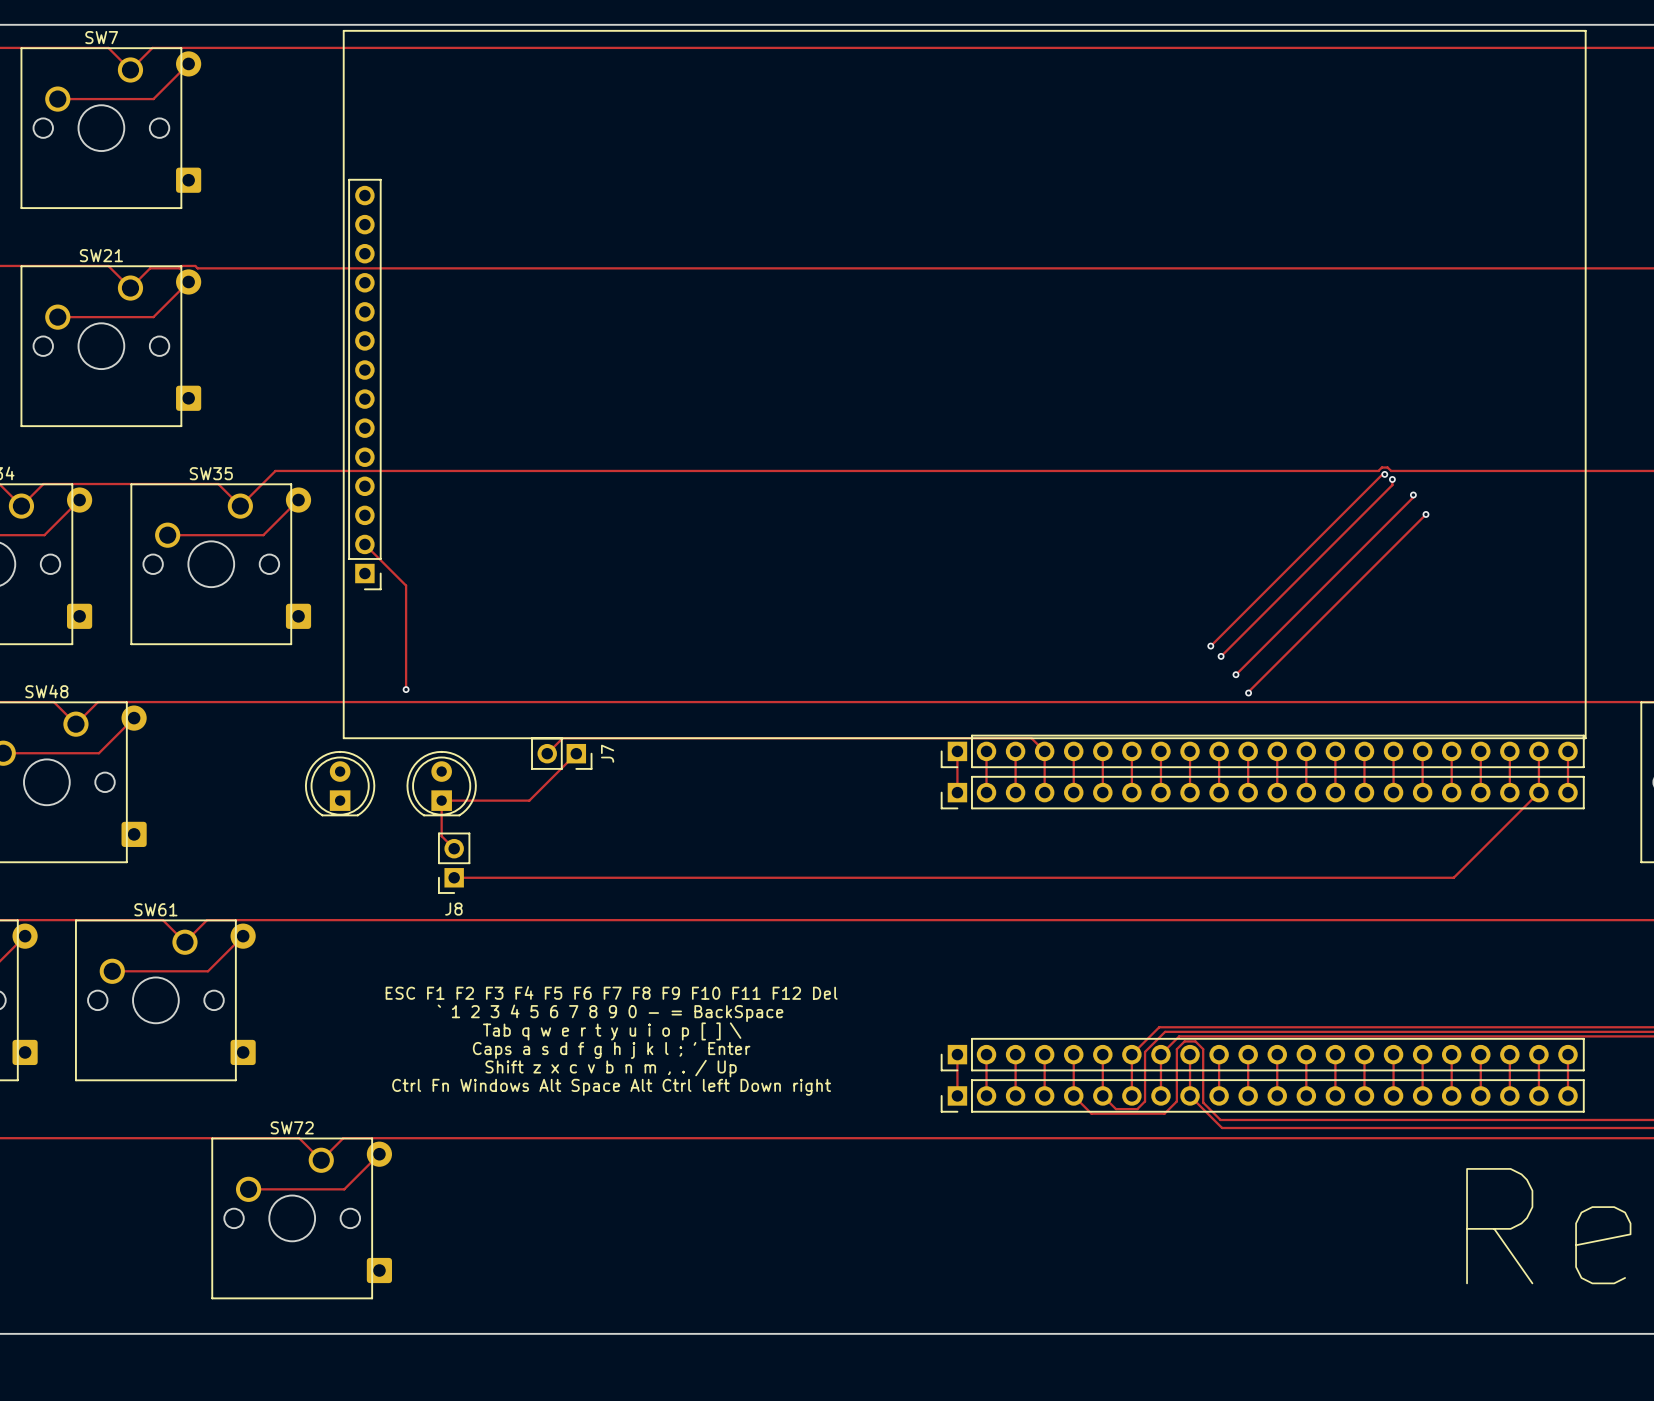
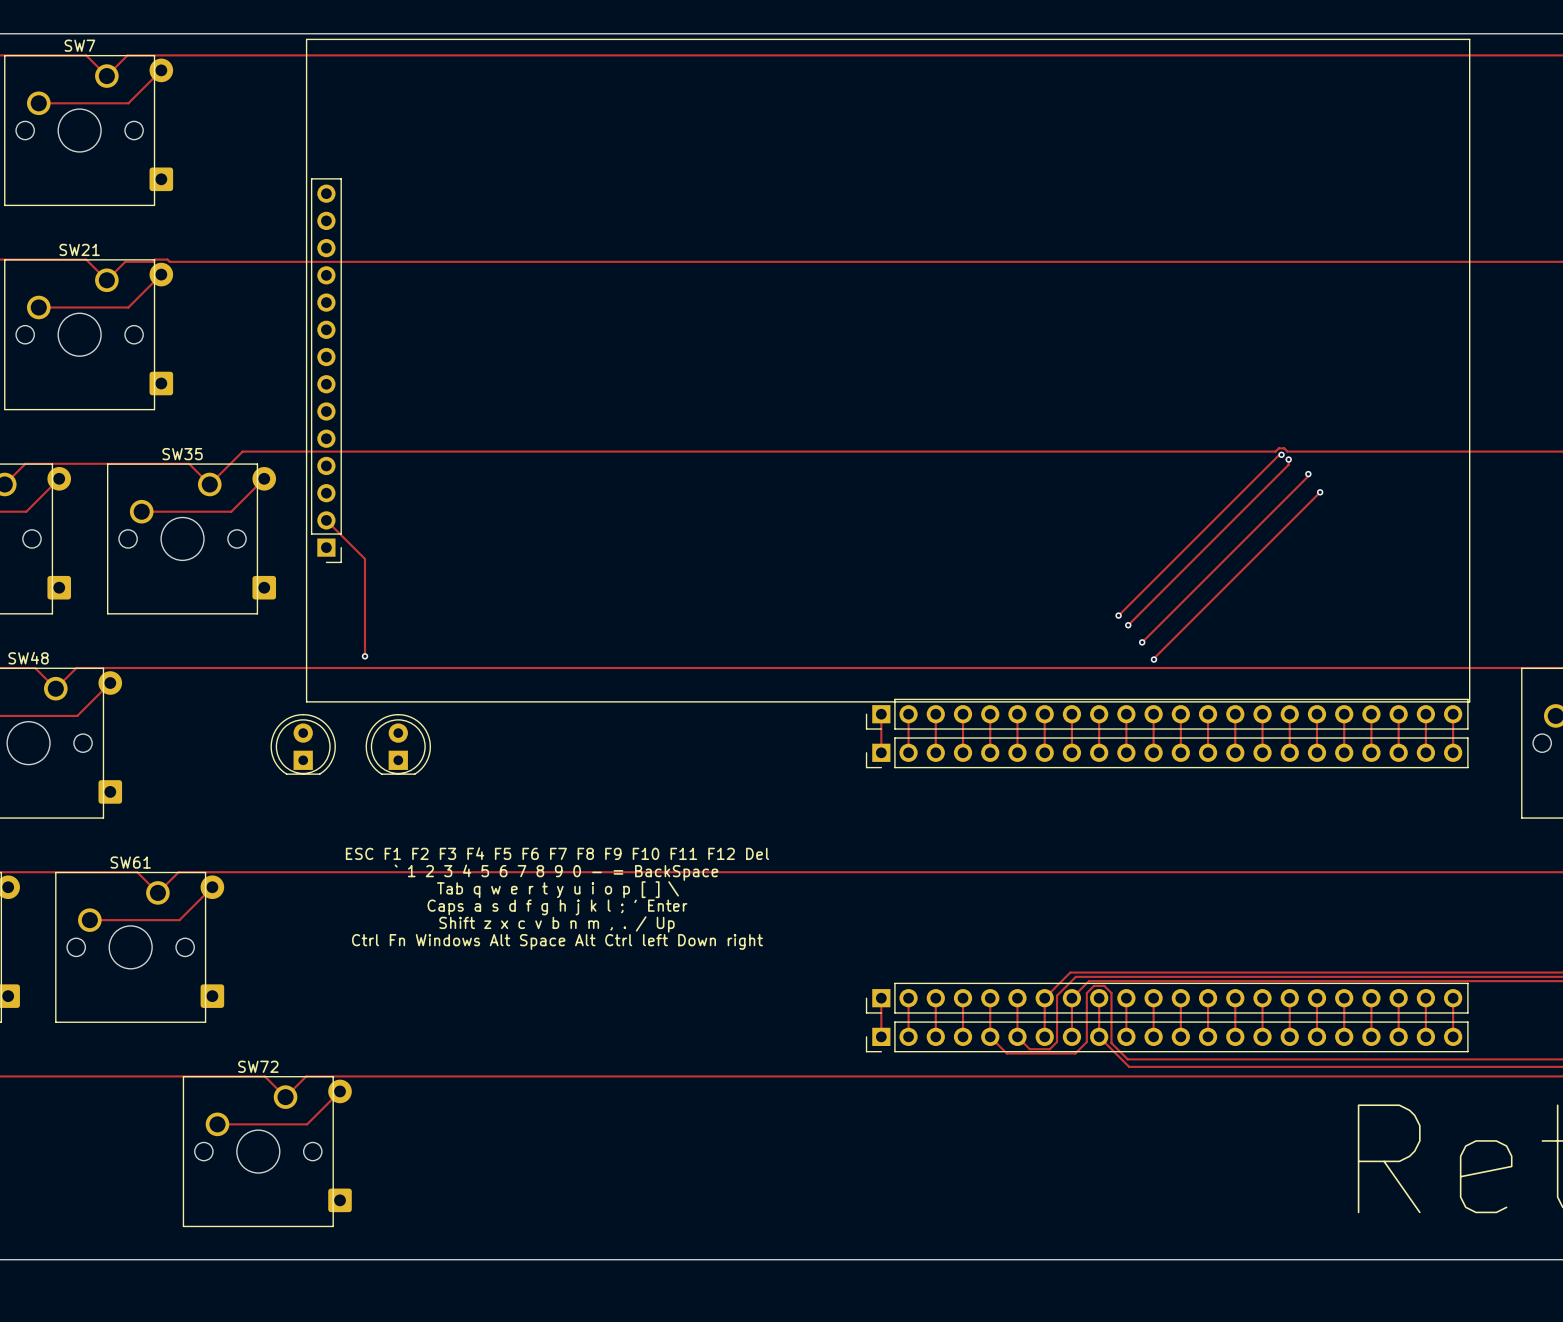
track: (1044, 751) (1031, 738) (562, 738) (547, 753) -> none
J7: (561, 753) -> none
track: (576, 753) (529, 800) (441, 800) (441, 836) (454, 848) -> none
track: (1538, 792) (1453, 877) (454, 877) -> none
J8: (454, 863) -> none
text: none -> ESC F1 F2 F3 F4 F5 F6 F7 F8 F9 F10 F11 F12 Del (557, 853)
text: ESC F1 F2 F3 F4 F5 F6 F7 F8 F9 F10 F11 F12 Del (611, 992) -> Ctrl Fn Windows Alt Space Alt Ctrl left Down right (557, 941)
text position: ` 1 2 3 4 5 6 7 8 9 0 - = BackSpace (610, 1013) -> ` 1 2 3 4 5 6 7 8 9 0 - = BackSpace (556, 872)
text position: Tab q w e r t y u i o p [ ] \ (612, 1031) -> Tab q w e r t y u i o p [ ] \ (557, 889)
text position: Caps a s d f g h j k l ; ' Enter (611, 1050) -> Caps a s d f g h j k l ; ' Enter (557, 907)
text position: Shift z x c v b n m , . / Up (611, 1068) -> Shift z x c v b n m , . / Up (556, 924)
text: Ctrl Fn Windows Alt Space Alt Ctrl left Down right (611, 1087) -> none

